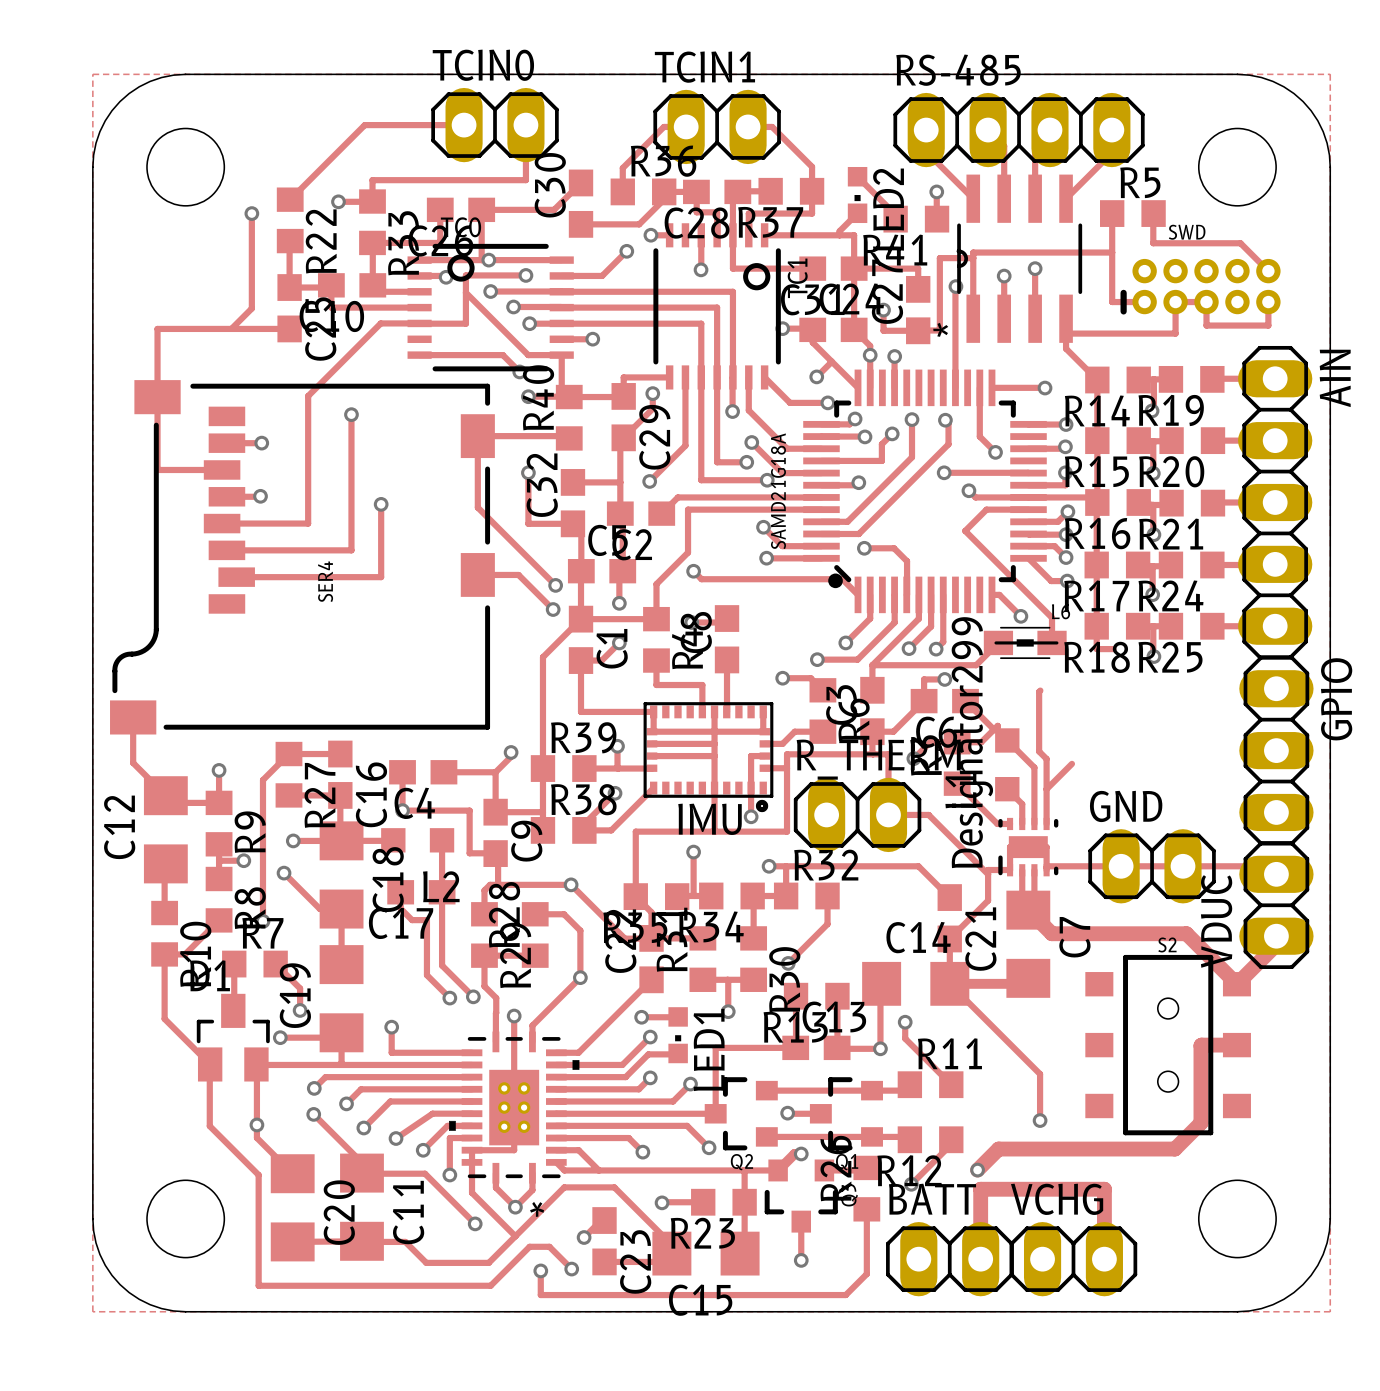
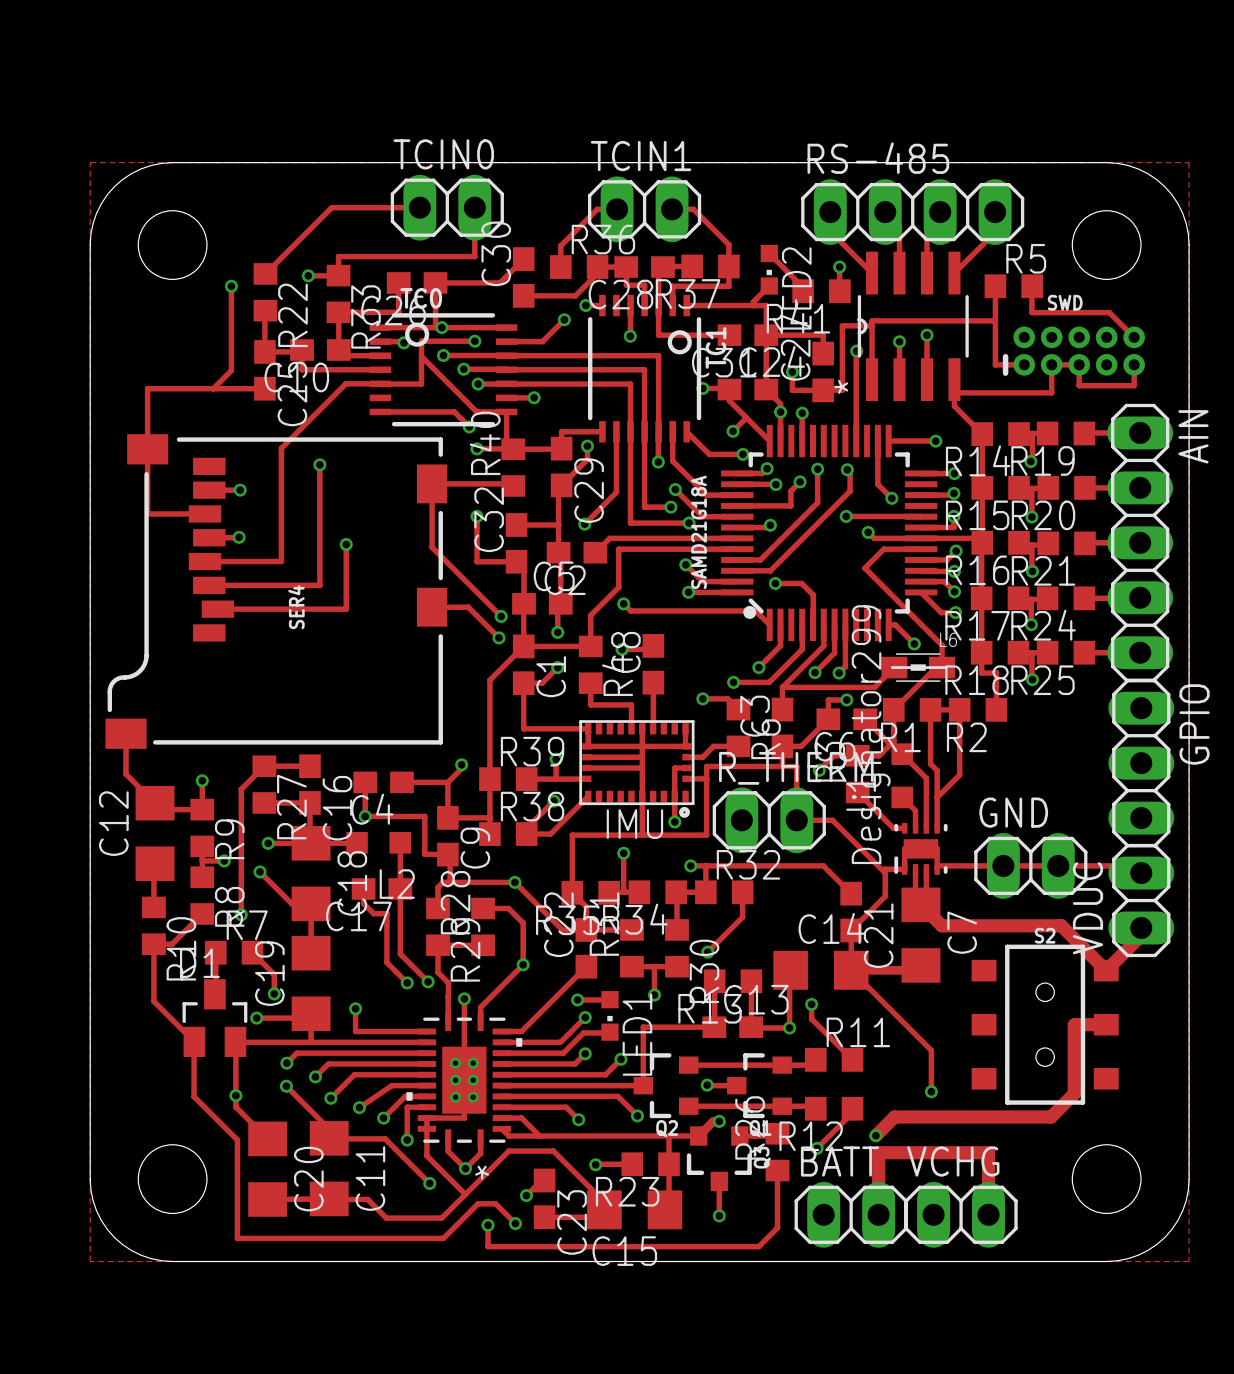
track: none -> (936, 667) (893, 709) (893, 741)
track: none -> (996, 673) (996, 709)
R1: none -> (912, 709)
track: none -> (931, 709) (959, 709) (959, 774)
R2: none -> (978, 709)

